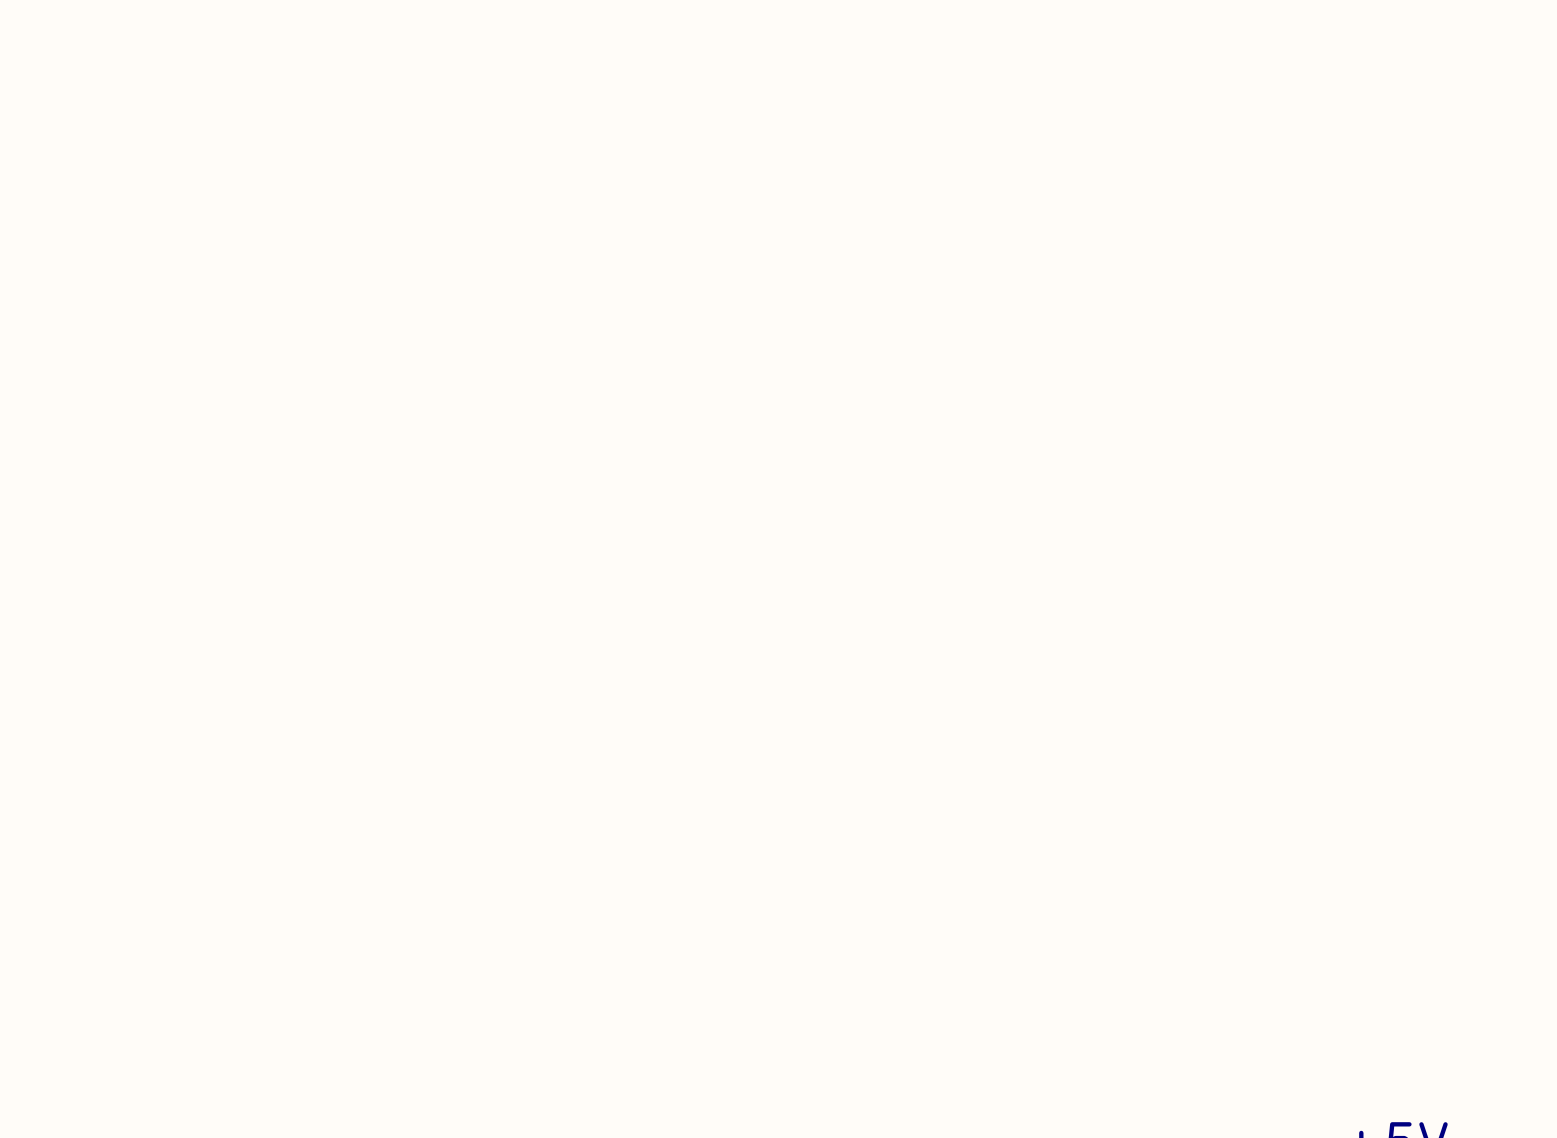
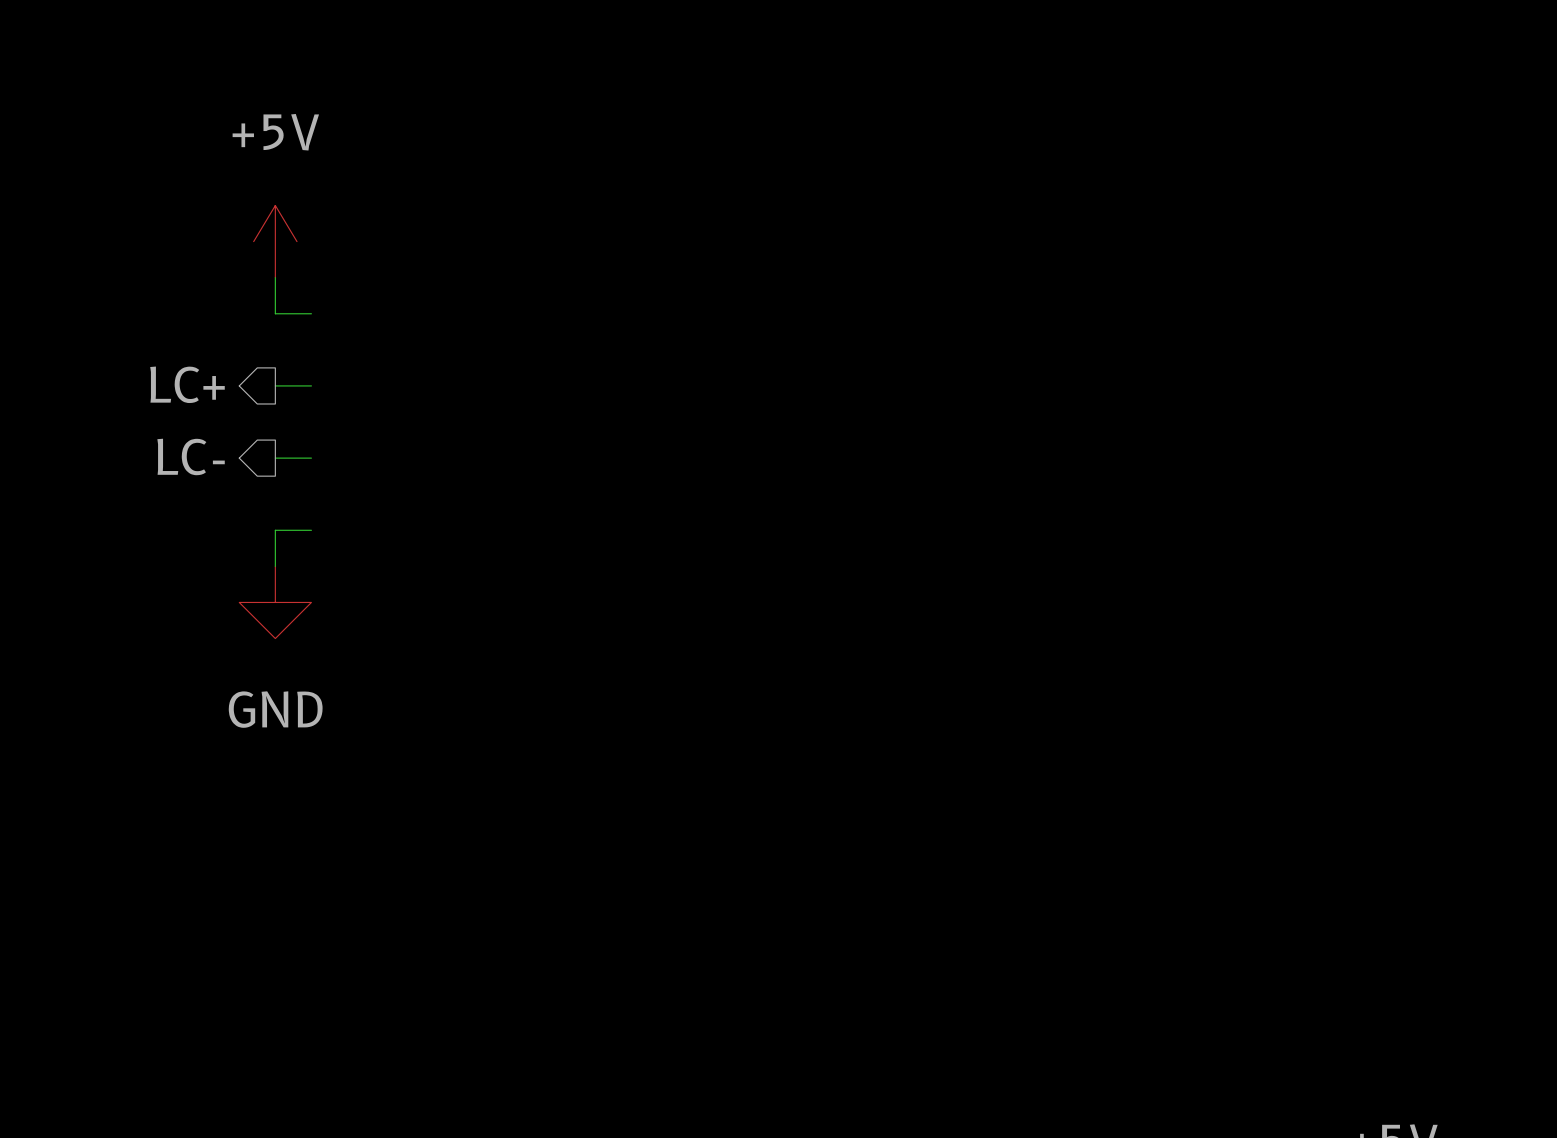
power symbol: none -> +5V (275, 241)
wire: none -> (275, 277) (275, 313) (311, 313)
hierarchical label: none -> LC+ (187, 384)
wire: none -> (275, 385) (311, 385)
hierarchical label: none -> LC- (191, 456)
wire: none -> (275, 458) (311, 458)
wire: none -> (311, 530) (275, 530) (275, 566)
power symbol: none -> GND (275, 602)

